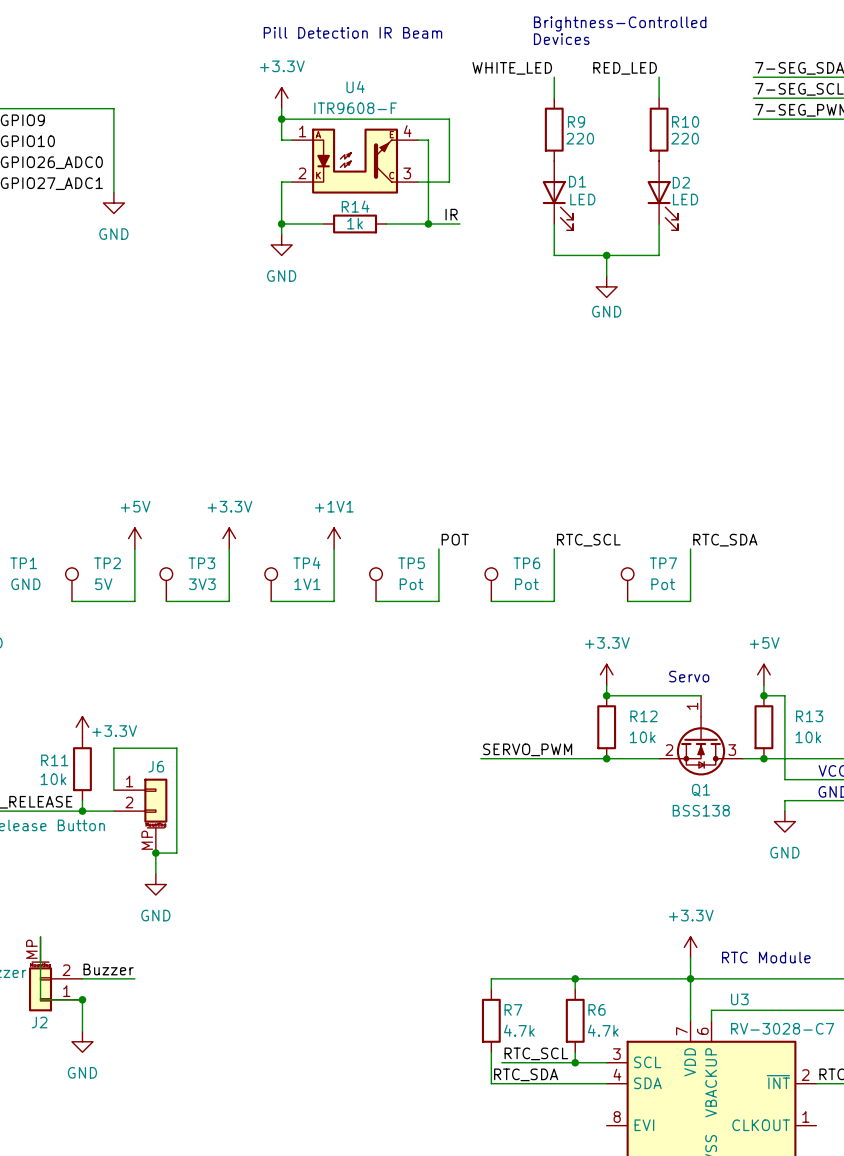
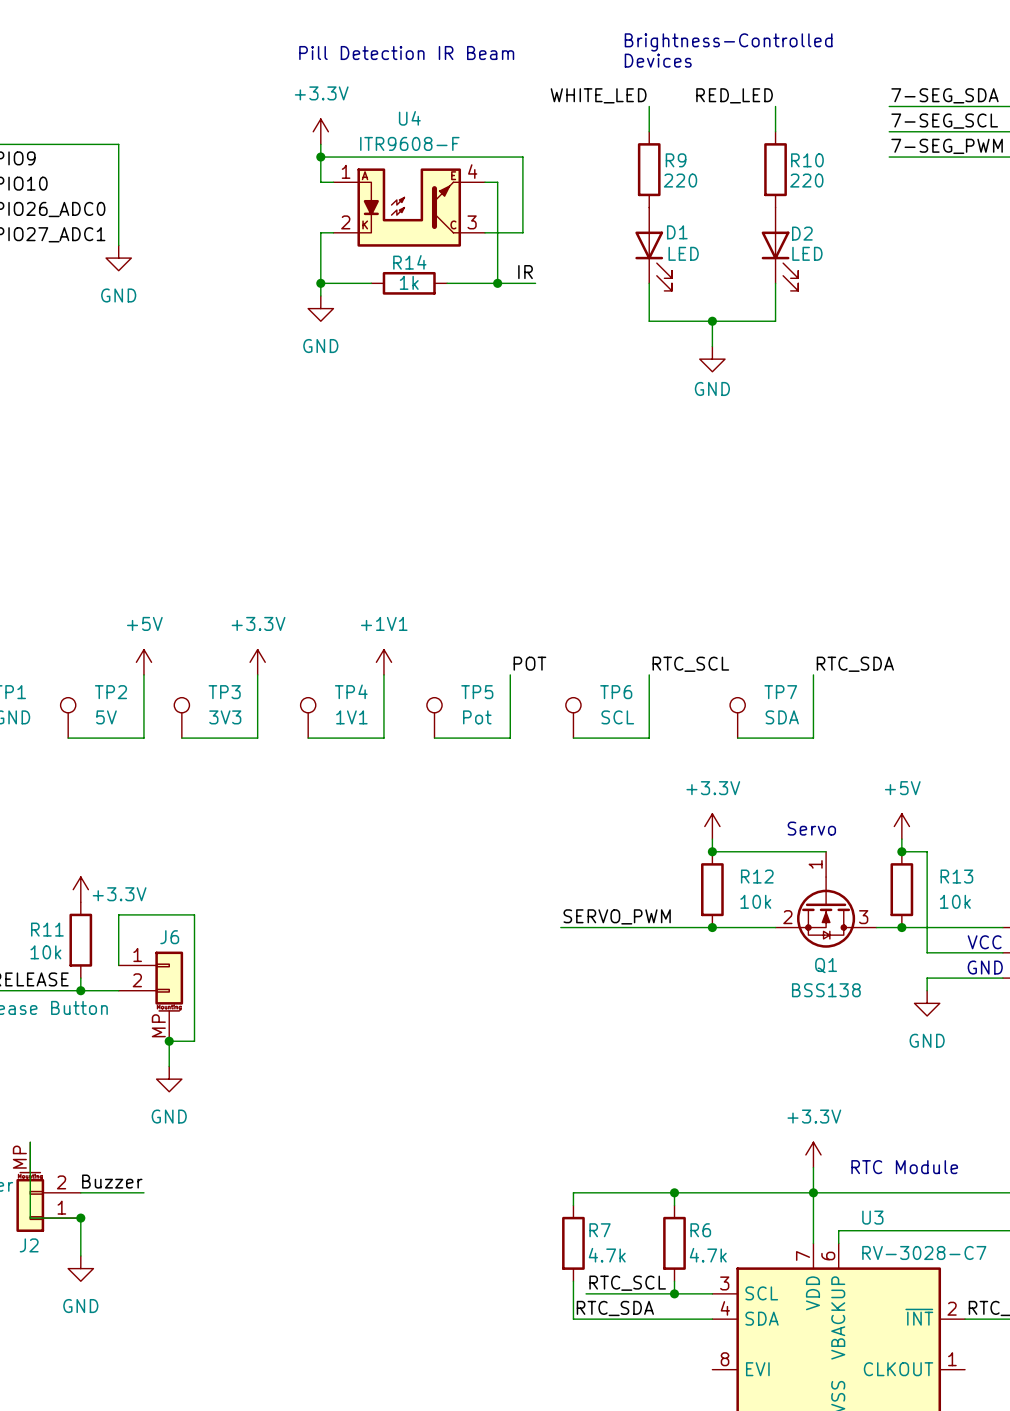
TP6 value: Pot (526, 584) -> SCL (617, 717)
TP7 value: Pot (663, 584) -> SDA (782, 717)

